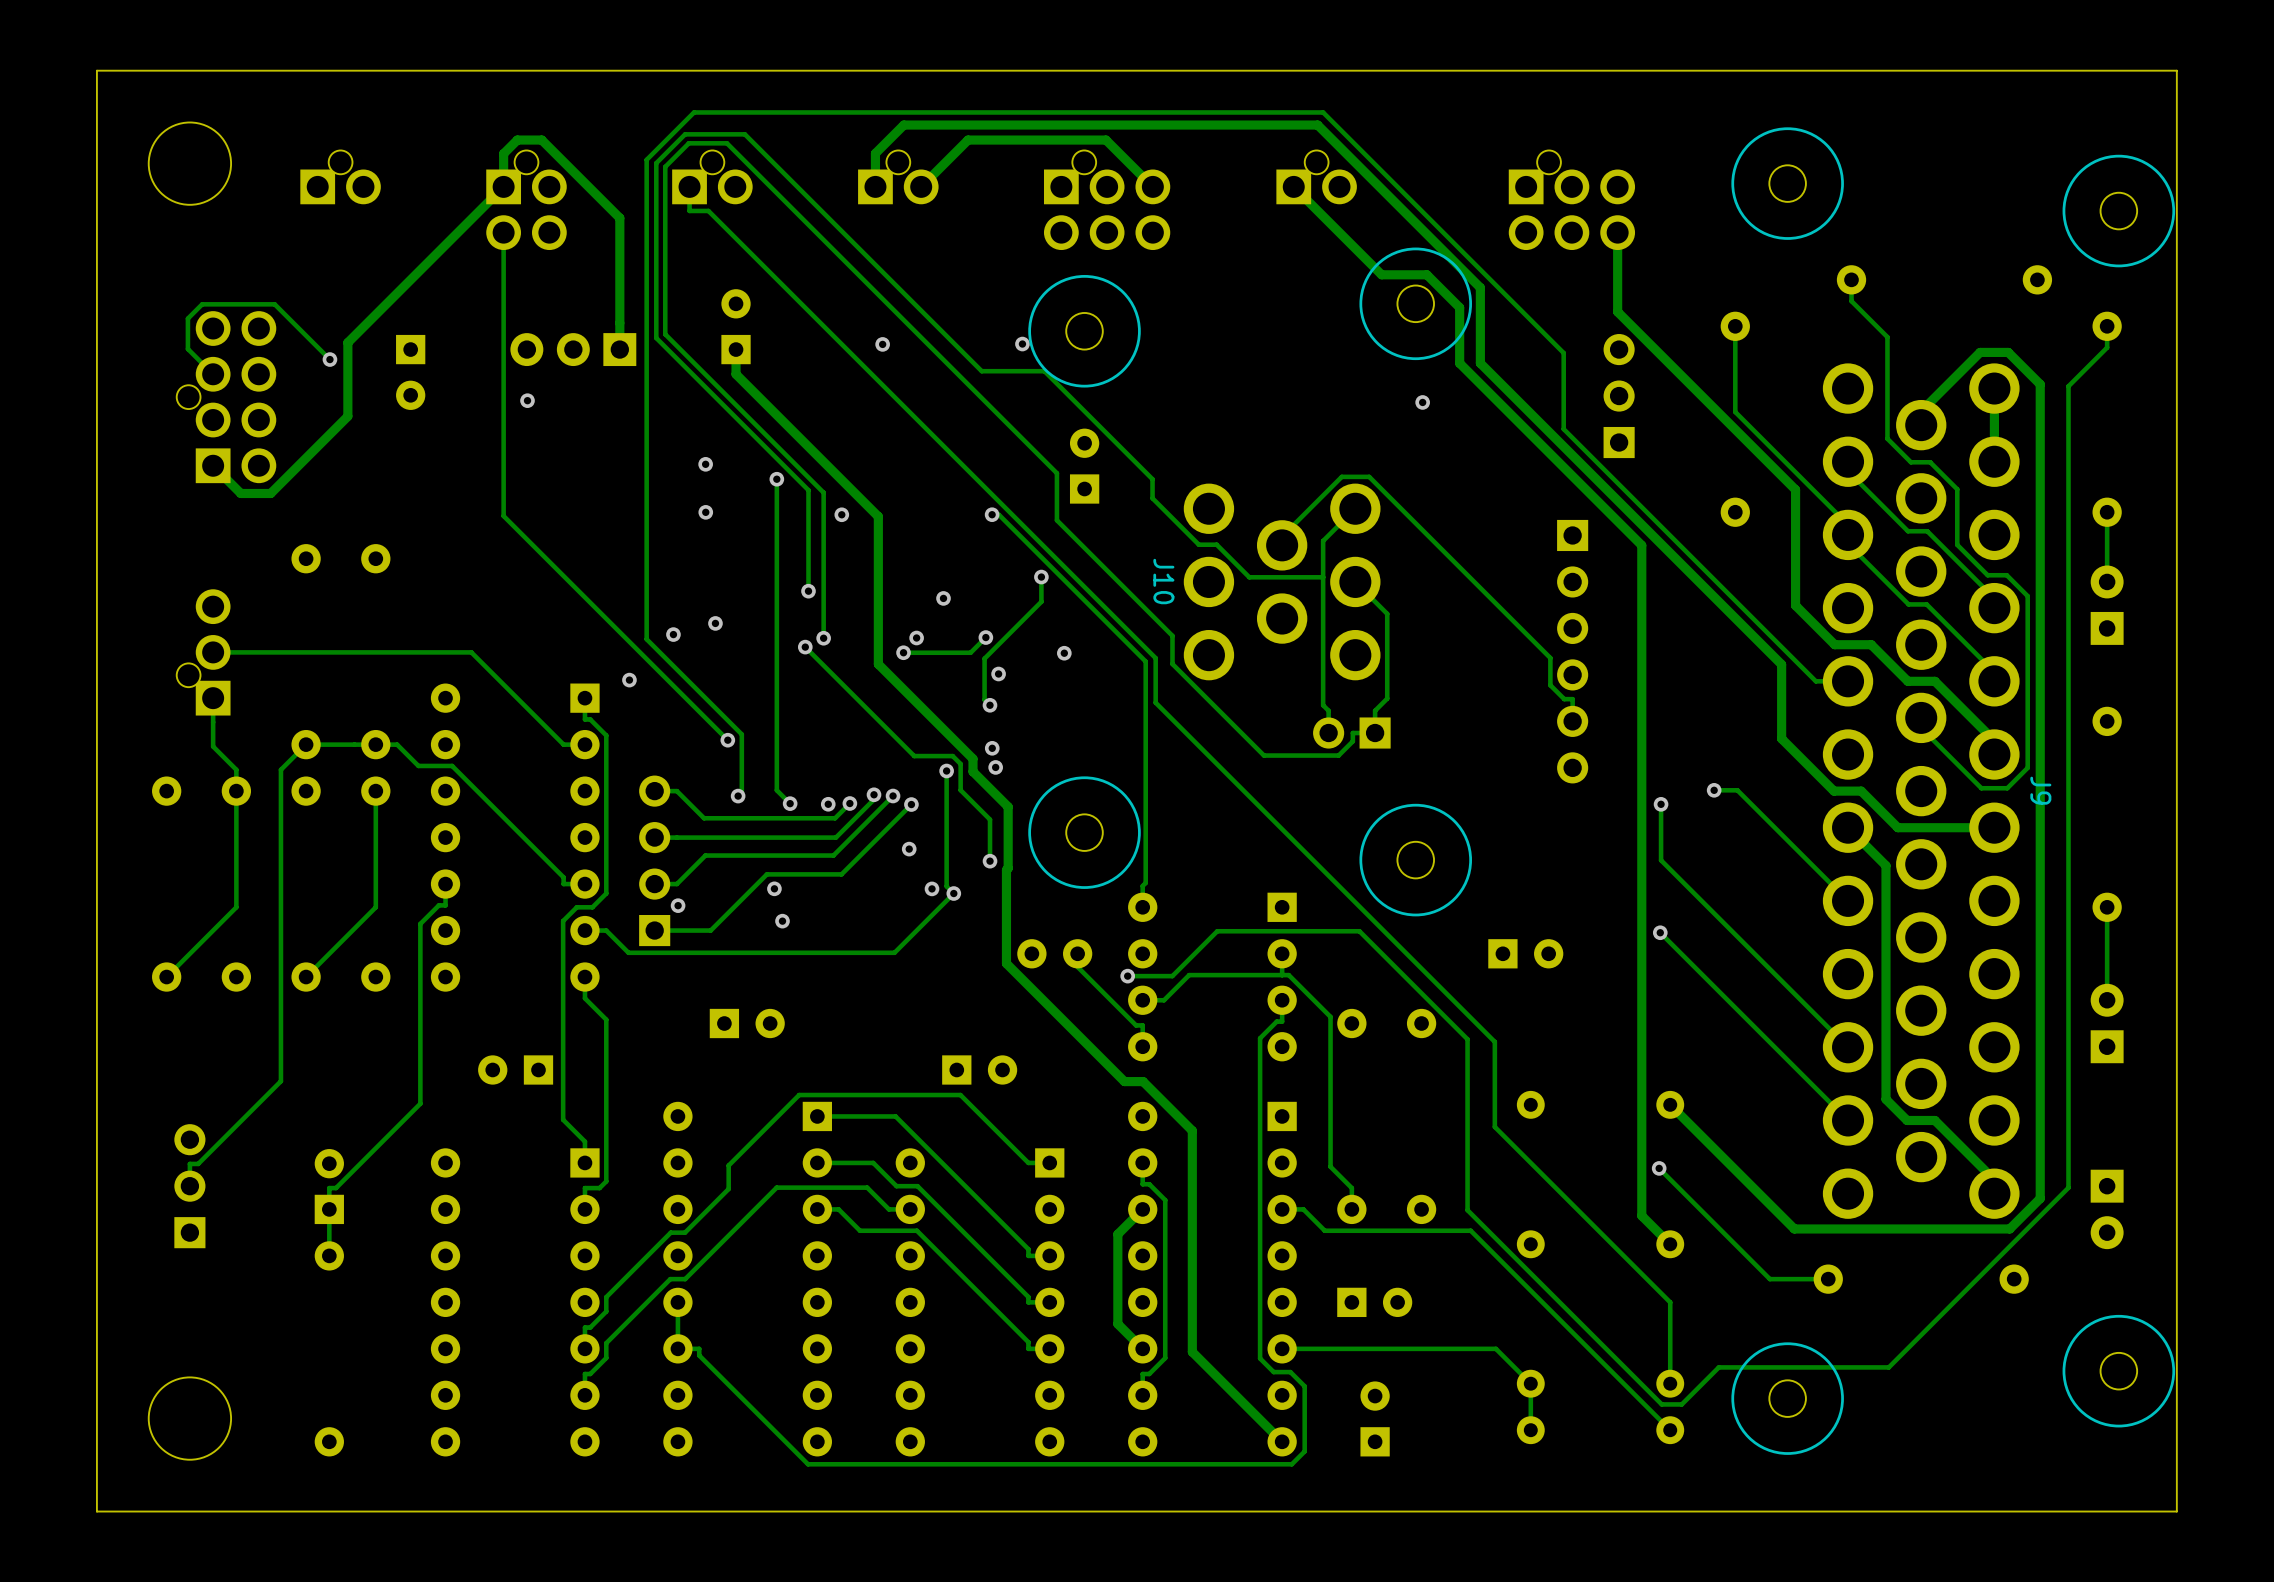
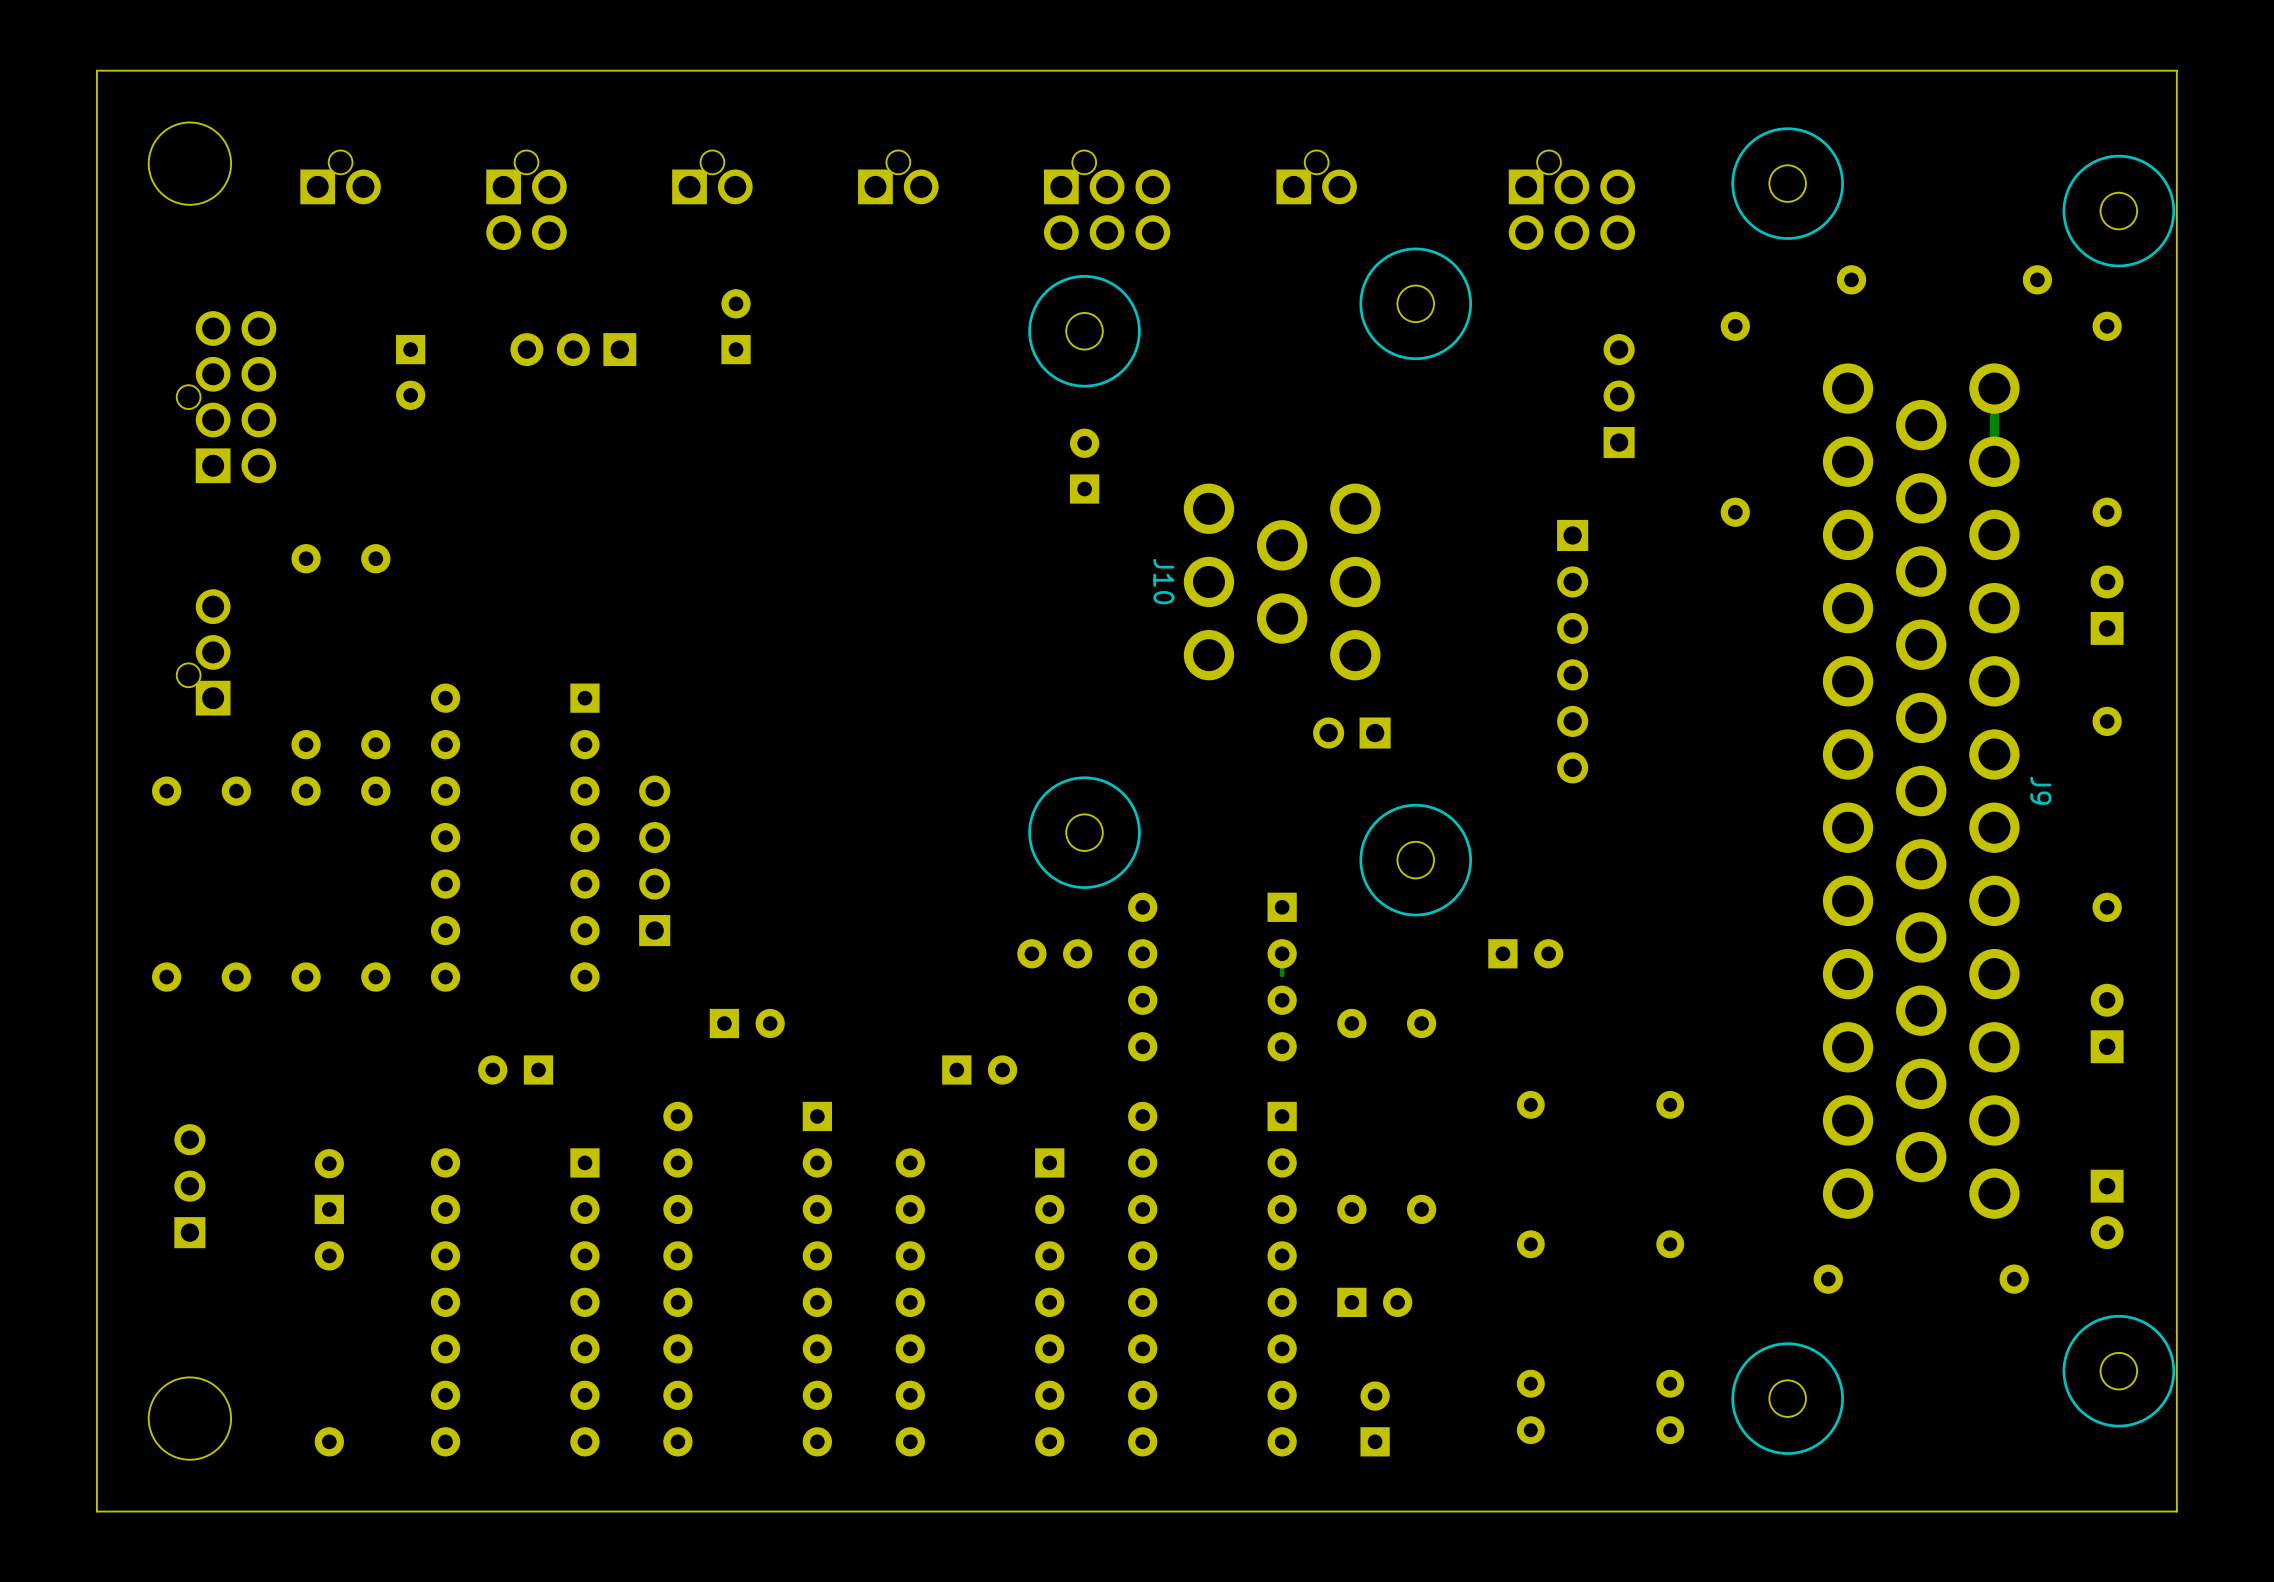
track: (689, 186) (689, 210) (708, 210) (1155, 658) (1155, 702) (1494, 1041) (1494, 1126) (1670, 1302) (1670, 1383) -> none
track: (875, 186) (875, 153) (903, 125) (1317, 125) (1480, 287) (1480, 363) (1781, 664) (1781, 738) (1834, 791) (1861, 791) (1897, 827) (1994, 827) -> none
track: (1152, 186) (1106, 140) (968, 140) (921, 186) -> none
track: (1293, 186) (1381, 274) (1426, 274) (1459, 307) (1459, 363) (1641, 545) (1641, 1215) (1670, 1244) -> none
track: (503, 232) (503, 516) (727, 740) -> none
track: (1617, 232) (1617, 311) (1795, 489) (1795, 605) (1834, 644) (1871, 644) (1907, 681) (1934, 681) (1994, 740) (1994, 754) -> none
track: (1851, 279) (1851, 301) (1887, 337) (1887, 438) (1910, 462) (1930, 462) (1957, 489) (1957, 544) (1987, 575) (2006, 575) (2027, 596) (2027, 767) (2007, 788) (1981, 788) (1921, 728) (1921, 717) -> none
track: (1735, 326) (1735, 412) (1848, 524) (1848, 543) (1908, 604) (1926, 604) (1994, 672) (1994, 681) -> none
track: (2107, 326) (2107, 347) (2068, 386) (2068, 1187) (1888, 1367) (1718, 1367) (1681, 1404) (1661, 1404) (1467, 1210) (1467, 1039) (1359, 931) (1217, 931) (1172, 976) (1127, 976) -> none
via: (882, 344) -> none
via: (1022, 344) -> none
track: (619, 349) (619, 218) (541, 140) (517, 140) (503, 153) (503, 186) (347, 342) (347, 416) (270, 493) (240, 493) (213, 465) -> none
track: (736, 349) (736, 374) (878, 516) (878, 664) (972, 758) (972, 771) (1008, 806) (1006, 963) (1124, 1081) (1143, 1081) (1192, 1130) (1192, 1352) (1282, 1441) -> none
track: (329, 359) (274, 304) (202, 304) (187, 318) (187, 349) (213, 374) -> none
via: (329, 359) -> none
via: (527, 400) -> none
via: (1422, 402) -> none
track: (1921, 425) (1921, 411) (1980, 352) (2008, 352) (2040, 384) (2040, 1198) (2009, 1228) (1794, 1228) (1670, 1104) -> none
track: (1848, 461) (1848, 471) (1908, 531) (1927, 531) (1994, 598) (1994, 608) -> none
via: (705, 464) -> none
track: (776, 479) (776, 790) (790, 803) -> none
via: (776, 479) -> none
track: (1355, 508) (1323, 540) (1323, 705) (1328, 710) (1328, 733) -> none
via: (705, 512) -> none
track: (2107, 512) (2107, 581) -> none
via: (841, 514) -> none
track: (992, 514) (998, 514) (1145, 661) (1145, 882) (1142, 885) (1142, 907) -> none
via: (992, 514) -> none
track: (1282, 545) (1282, 536) (1341, 476) (1369, 476) (1550, 658) (1550, 685) (1564, 699) (1572, 699) (1572, 721) -> none
track: (1041, 577) (1041, 601) (984, 658) (984, 699) (989, 705) -> none
via: (1041, 577) -> none
track: (1323, 577) (1249, 577) (1216, 544) (1198, 544) (1152, 498) (1152, 479) (1044, 371) (981, 371) (744, 134) (685, 134) (656, 163) (656, 338) (808, 490) (808, 591) -> none
track: (1355, 581) (1387, 613) (1387, 698) (1375, 710) (1375, 733) (1352, 733) (1352, 741) (1338, 755) (1263, 755) (1172, 664) (1172, 635) (1056, 520) (1056, 473) (726, 143) (688, 143) (665, 166) (665, 334) (823, 492) (823, 638) -> none
via: (808, 591) -> none
via: (943, 598) -> none
via: (715, 623) -> none
via: (673, 634) -> none
track: (985, 637) (970, 652) (903, 652) -> none
via: (985, 637) -> none
via: (823, 638) -> none
via: (916, 638) -> none
track: (805, 647) (914, 756) (952, 756) (960, 763) (960, 790) (990, 819) (990, 861) -> none
via: (805, 647) -> none
track: (213, 652) (471, 652) (563, 744) (584, 744) -> none
via: (903, 652) -> none
via: (1064, 653) -> none
via: (998, 674) -> none
via: (629, 680) -> none
track: (1848, 681) (1815, 681) (1563, 429) (1563, 353) (1323, 112) (694, 112) (646, 159) (646, 639) (741, 734) (741, 792) (738, 796) -> none
track: (213, 698) (213, 746) (236, 769) (236, 907) (166, 977) -> none
track: (584, 698) (584, 719) (590, 719) (606, 735) (606, 893) (592, 907) (576, 907) (563, 921) (563, 1119) (584, 1141) (584, 1162) -> none
via: (989, 705) -> none
via: (727, 740) -> none
via: (992, 748) -> none
via: (995, 767) -> none
track: (946, 771) (946, 886) (953, 893) (894, 952) (628, 952) (606, 930) (584, 930) -> none
via: (946, 771) -> none
track: (1714, 790) (1737, 790) (1848, 900) -> none
via: (1714, 790) -> none
track: (375, 791) (375, 907) (306, 977) -> none
track: (654, 791) (676, 791) (704, 818) (835, 818) (849, 803) -> none
track: (874, 794) (874, 799) (835, 837) (654, 837) -> none
via: (874, 794) -> none
via: (738, 796) -> none
track: (893, 796) (833, 855) (705, 855) (676, 884) (654, 884) -> none
via: (893, 796) -> none
via: (790, 803) -> none
via: (849, 803) -> none
via: (828, 804) -> none
track: (911, 804) (841, 874) (766, 874) (710, 930) (654, 930) -> none
via: (911, 804) -> none
track: (1661, 804) (1661, 860) (1848, 1047) -> none
via: (1661, 804) -> none
track: (1848, 827) (1885, 865) (1885, 1099) (1907, 1120) (1934, 1120) (1994, 1179) (1994, 1193) -> none
via: (909, 849) -> none
via: (990, 861) -> none
track: (445, 884) (445, 905) (438, 905) (420, 923) (420, 1103) (336, 1188) (329, 1188) (329, 1255) -> none
track: (584, 884) (563, 884) (563, 877) (452, 765) (418, 765) (397, 744) (306, 744) (280, 769) (280, 1081) (198, 1163) (189, 1163) (189, 1186) -> none
via: (774, 888) -> none
via: (932, 888) -> none
via: (953, 893) -> none
via: (678, 905) -> none
track: (2107, 907) (2107, 1000) -> none
via: (782, 921) -> none
track: (1660, 932) (1848, 1120) -> none
via: (1660, 932) -> none
track: (1077, 953) (1077, 966) (1136, 1025) (1142, 1025) (1142, 1046) -> none
via: (1127, 976) -> none
track: (584, 977) (584, 998) (606, 1019) (606, 1181) (599, 1188) (584, 1188) (584, 1209) -> none
track: (1142, 1000) (1164, 1000) (1189, 975) (1288, 975) (1330, 1016) (1330, 1166) (1351, 1188) (1351, 1209) -> none
track: (1282, 1000) (1282, 1021) (1276, 1021) (1260, 1038) (1260, 1358) (1273, 1372) (1290, 1372) (1304, 1386) (1304, 1451) (1291, 1464) (808, 1464) (699, 1355) (699, 1348) (677, 1348) (677, 1302) -> none
track: (817, 1116) (895, 1116) (1028, 1249) (1028, 1255) (1049, 1255) -> none
track: (817, 1162) (873, 1162) (896, 1186) (917, 1186) (1028, 1297) (1028, 1302) (1049, 1302) -> none
track: (1049, 1162) (1028, 1162) (960, 1095) (799, 1095) (728, 1165) (728, 1189) (685, 1232) (670, 1232) (606, 1297) (606, 1311) (590, 1327) (584, 1327) (584, 1348) -> none
track: (1142, 1162) (1142, 1184) (1149, 1184) (1165, 1200) (1165, 1358) (1149, 1374) (1142, 1374) (1142, 1395) -> none
track: (1659, 1168) (1769, 1279) (1828, 1279) -> none
via: (1659, 1168) -> none
track: (817, 1209) (838, 1209) (860, 1230) (916, 1230) (1028, 1342) (1028, 1348) (1049, 1348) -> none
track: (910, 1209) (888, 1209) (867, 1187) (776, 1187) (685, 1279) (670, 1279) (606, 1343) (606, 1358) (590, 1374) (584, 1374) (584, 1395) -> none
track: (1142, 1209) (1117, 1234) (1117, 1323) (1142, 1348) -> none
track: (1282, 1209) (1303, 1209) (1324, 1230) (1470, 1230) (1670, 1430) -> none
track: (1282, 1348) (1495, 1348) (1530, 1383) (1530, 1430) -> none

